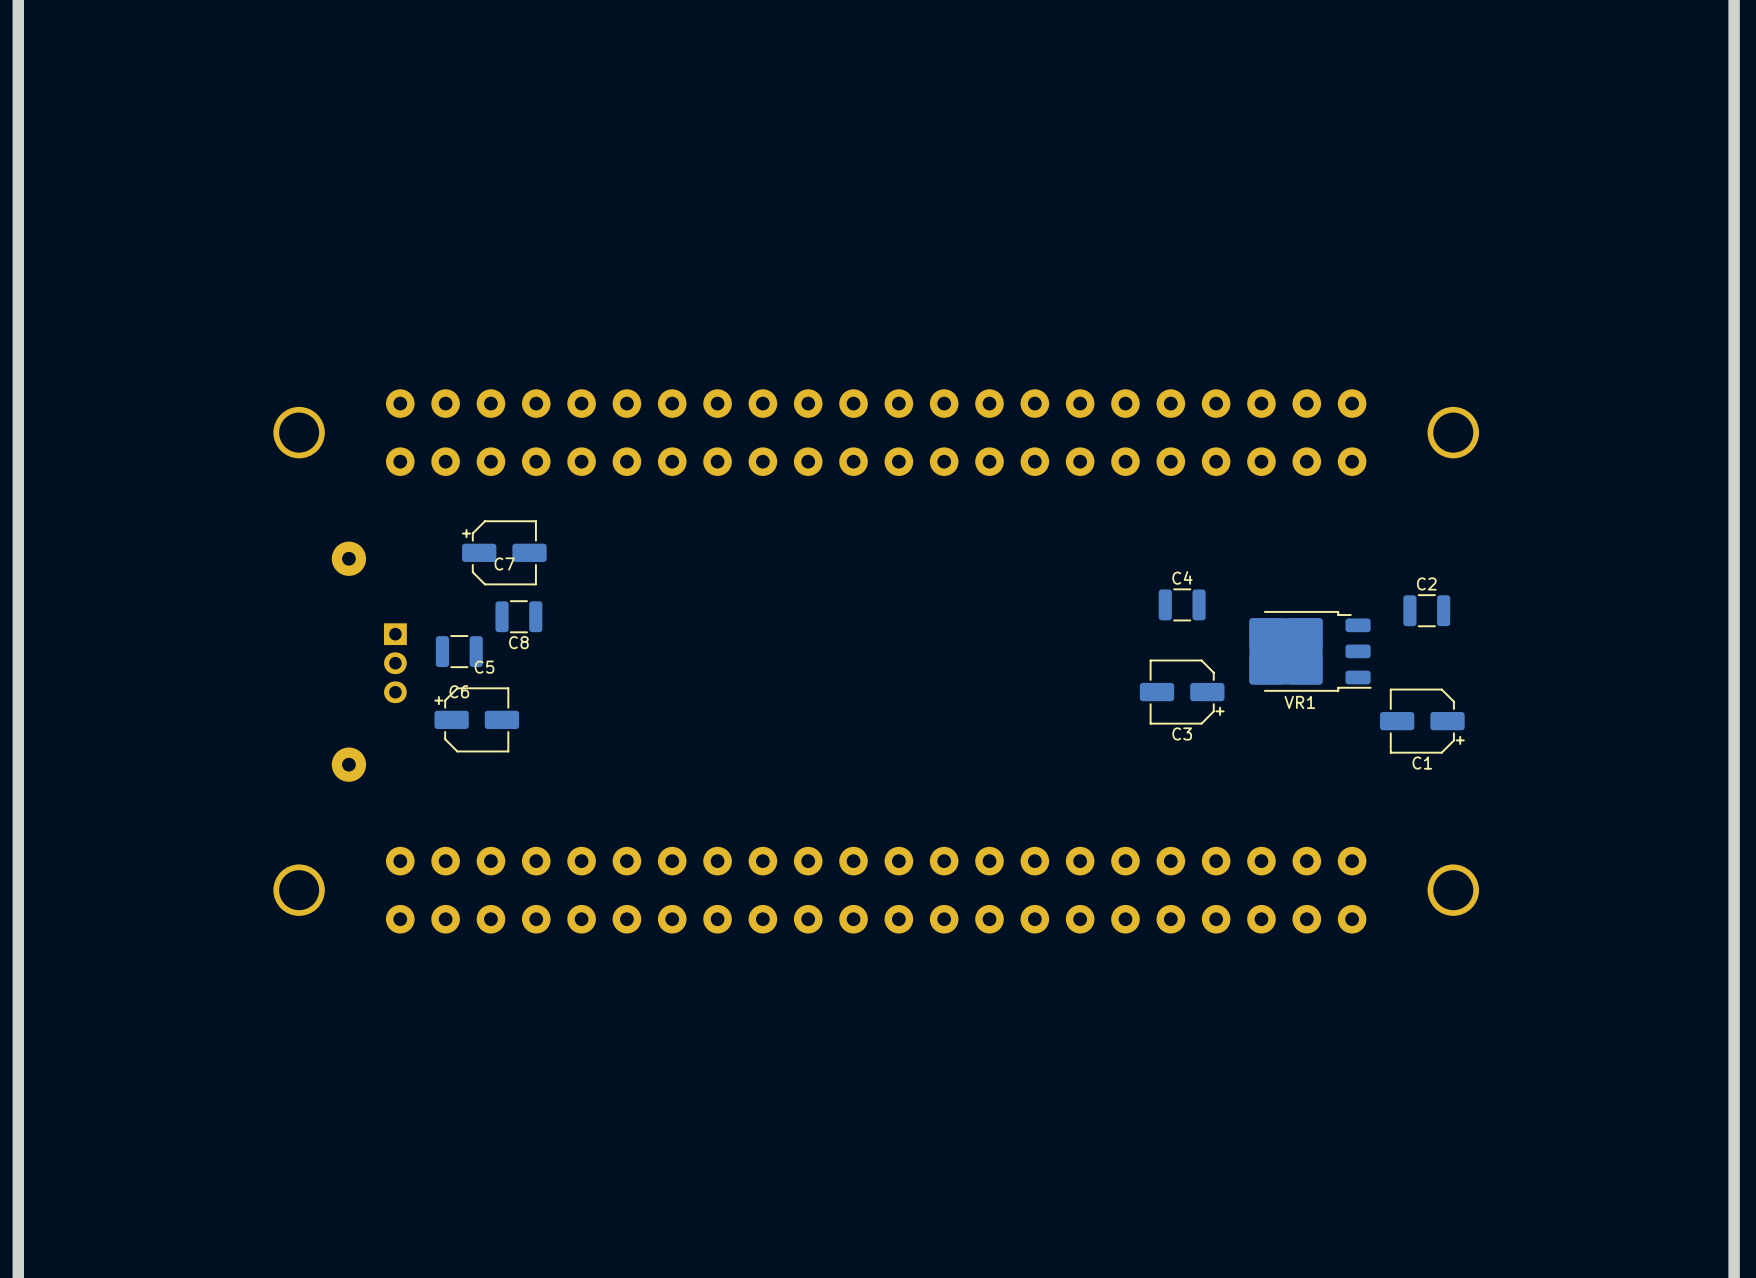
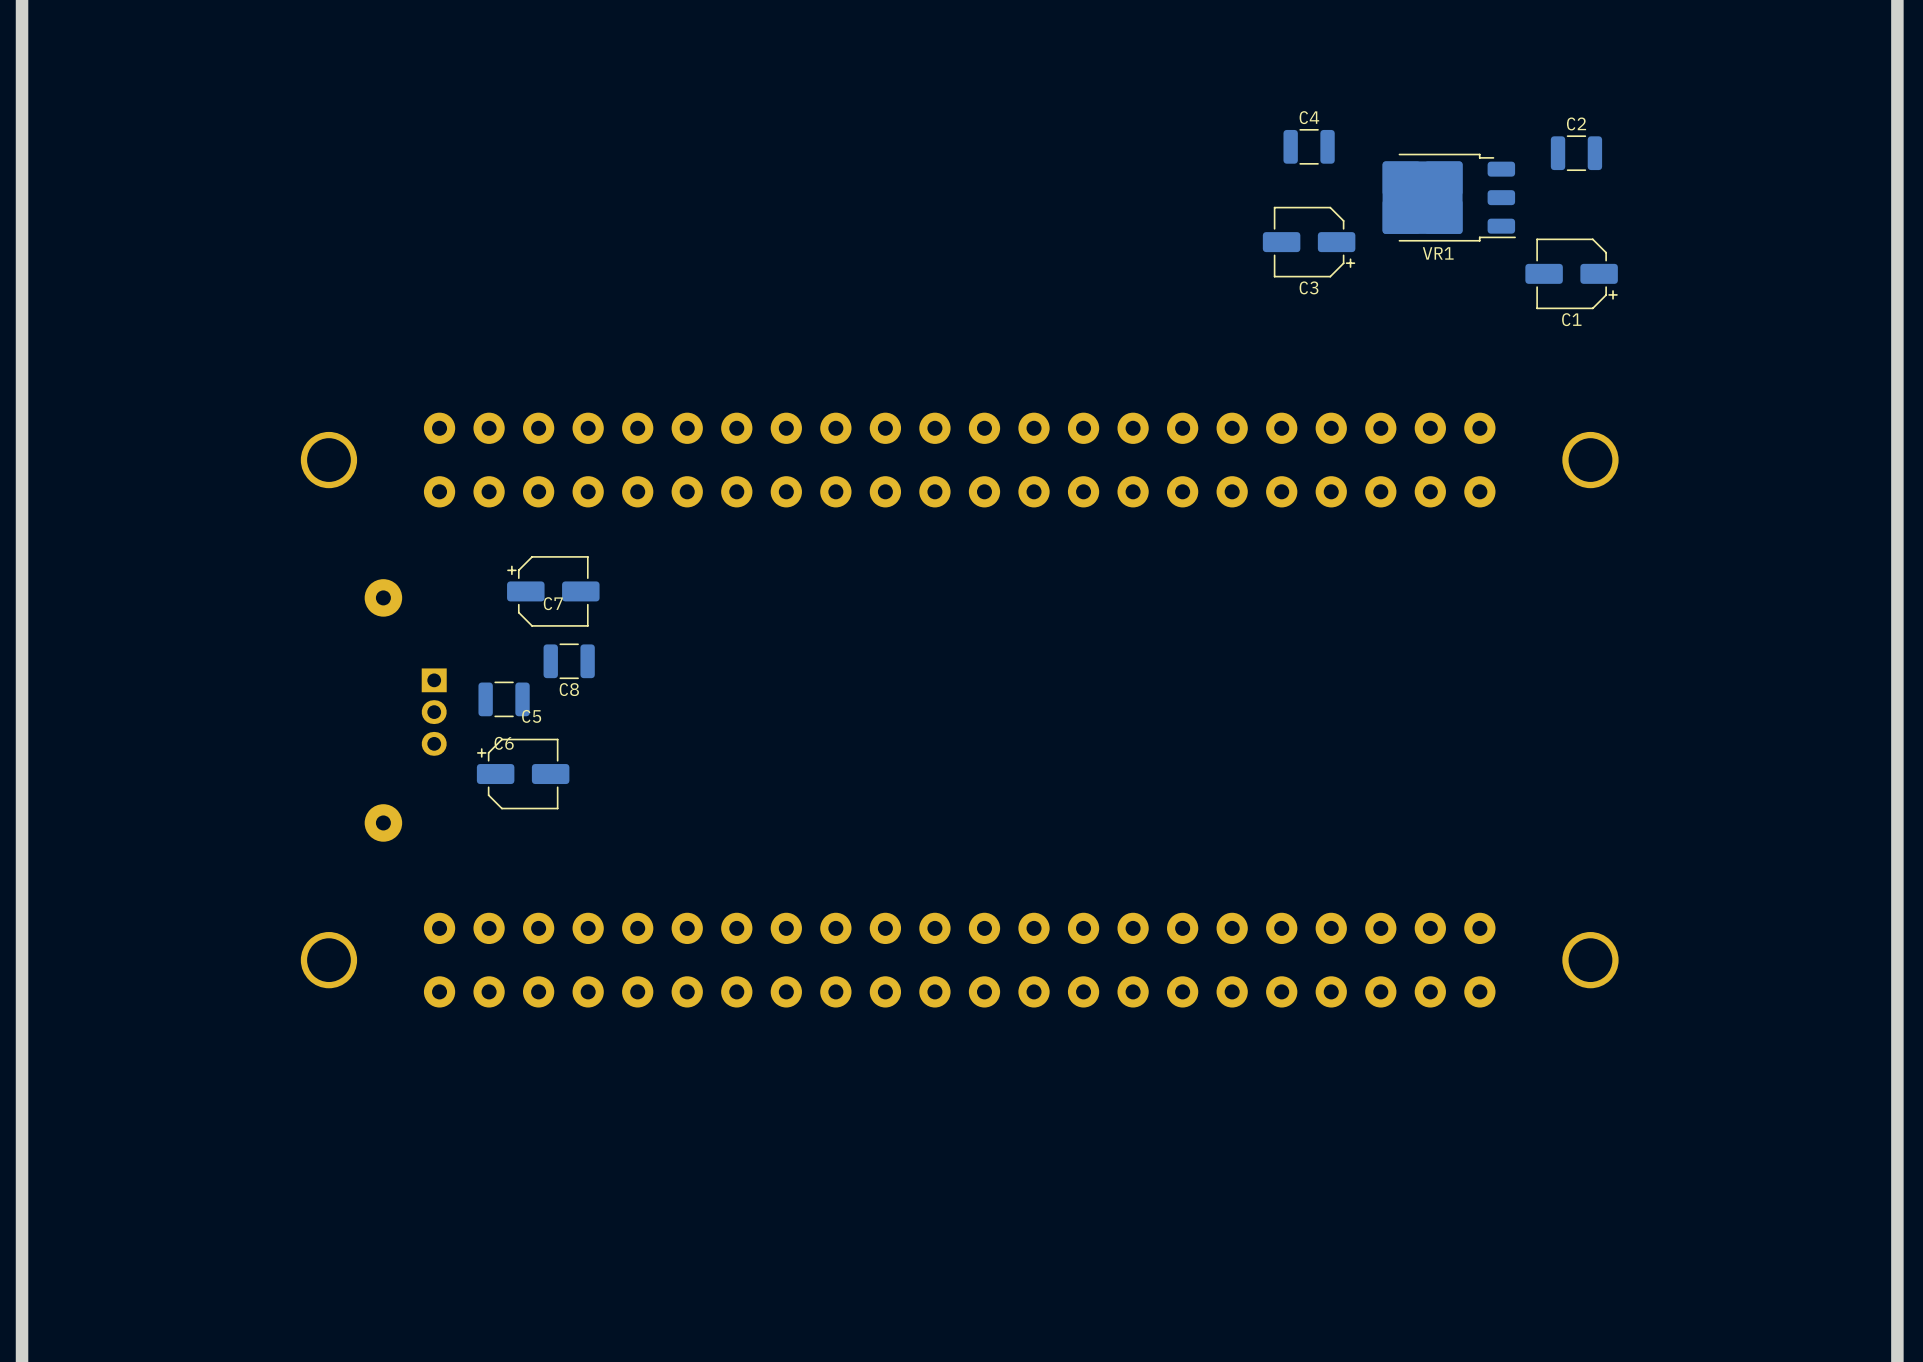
C4 position: (1182, 604) -> (1309, 146)
C2 position: (1426, 610) -> (1576, 153)
VR1 position: (1310, 651) -> (1449, 197)
C3 position: (1182, 692) -> (1309, 242)
C1 position: (1422, 721) -> (1571, 273)

